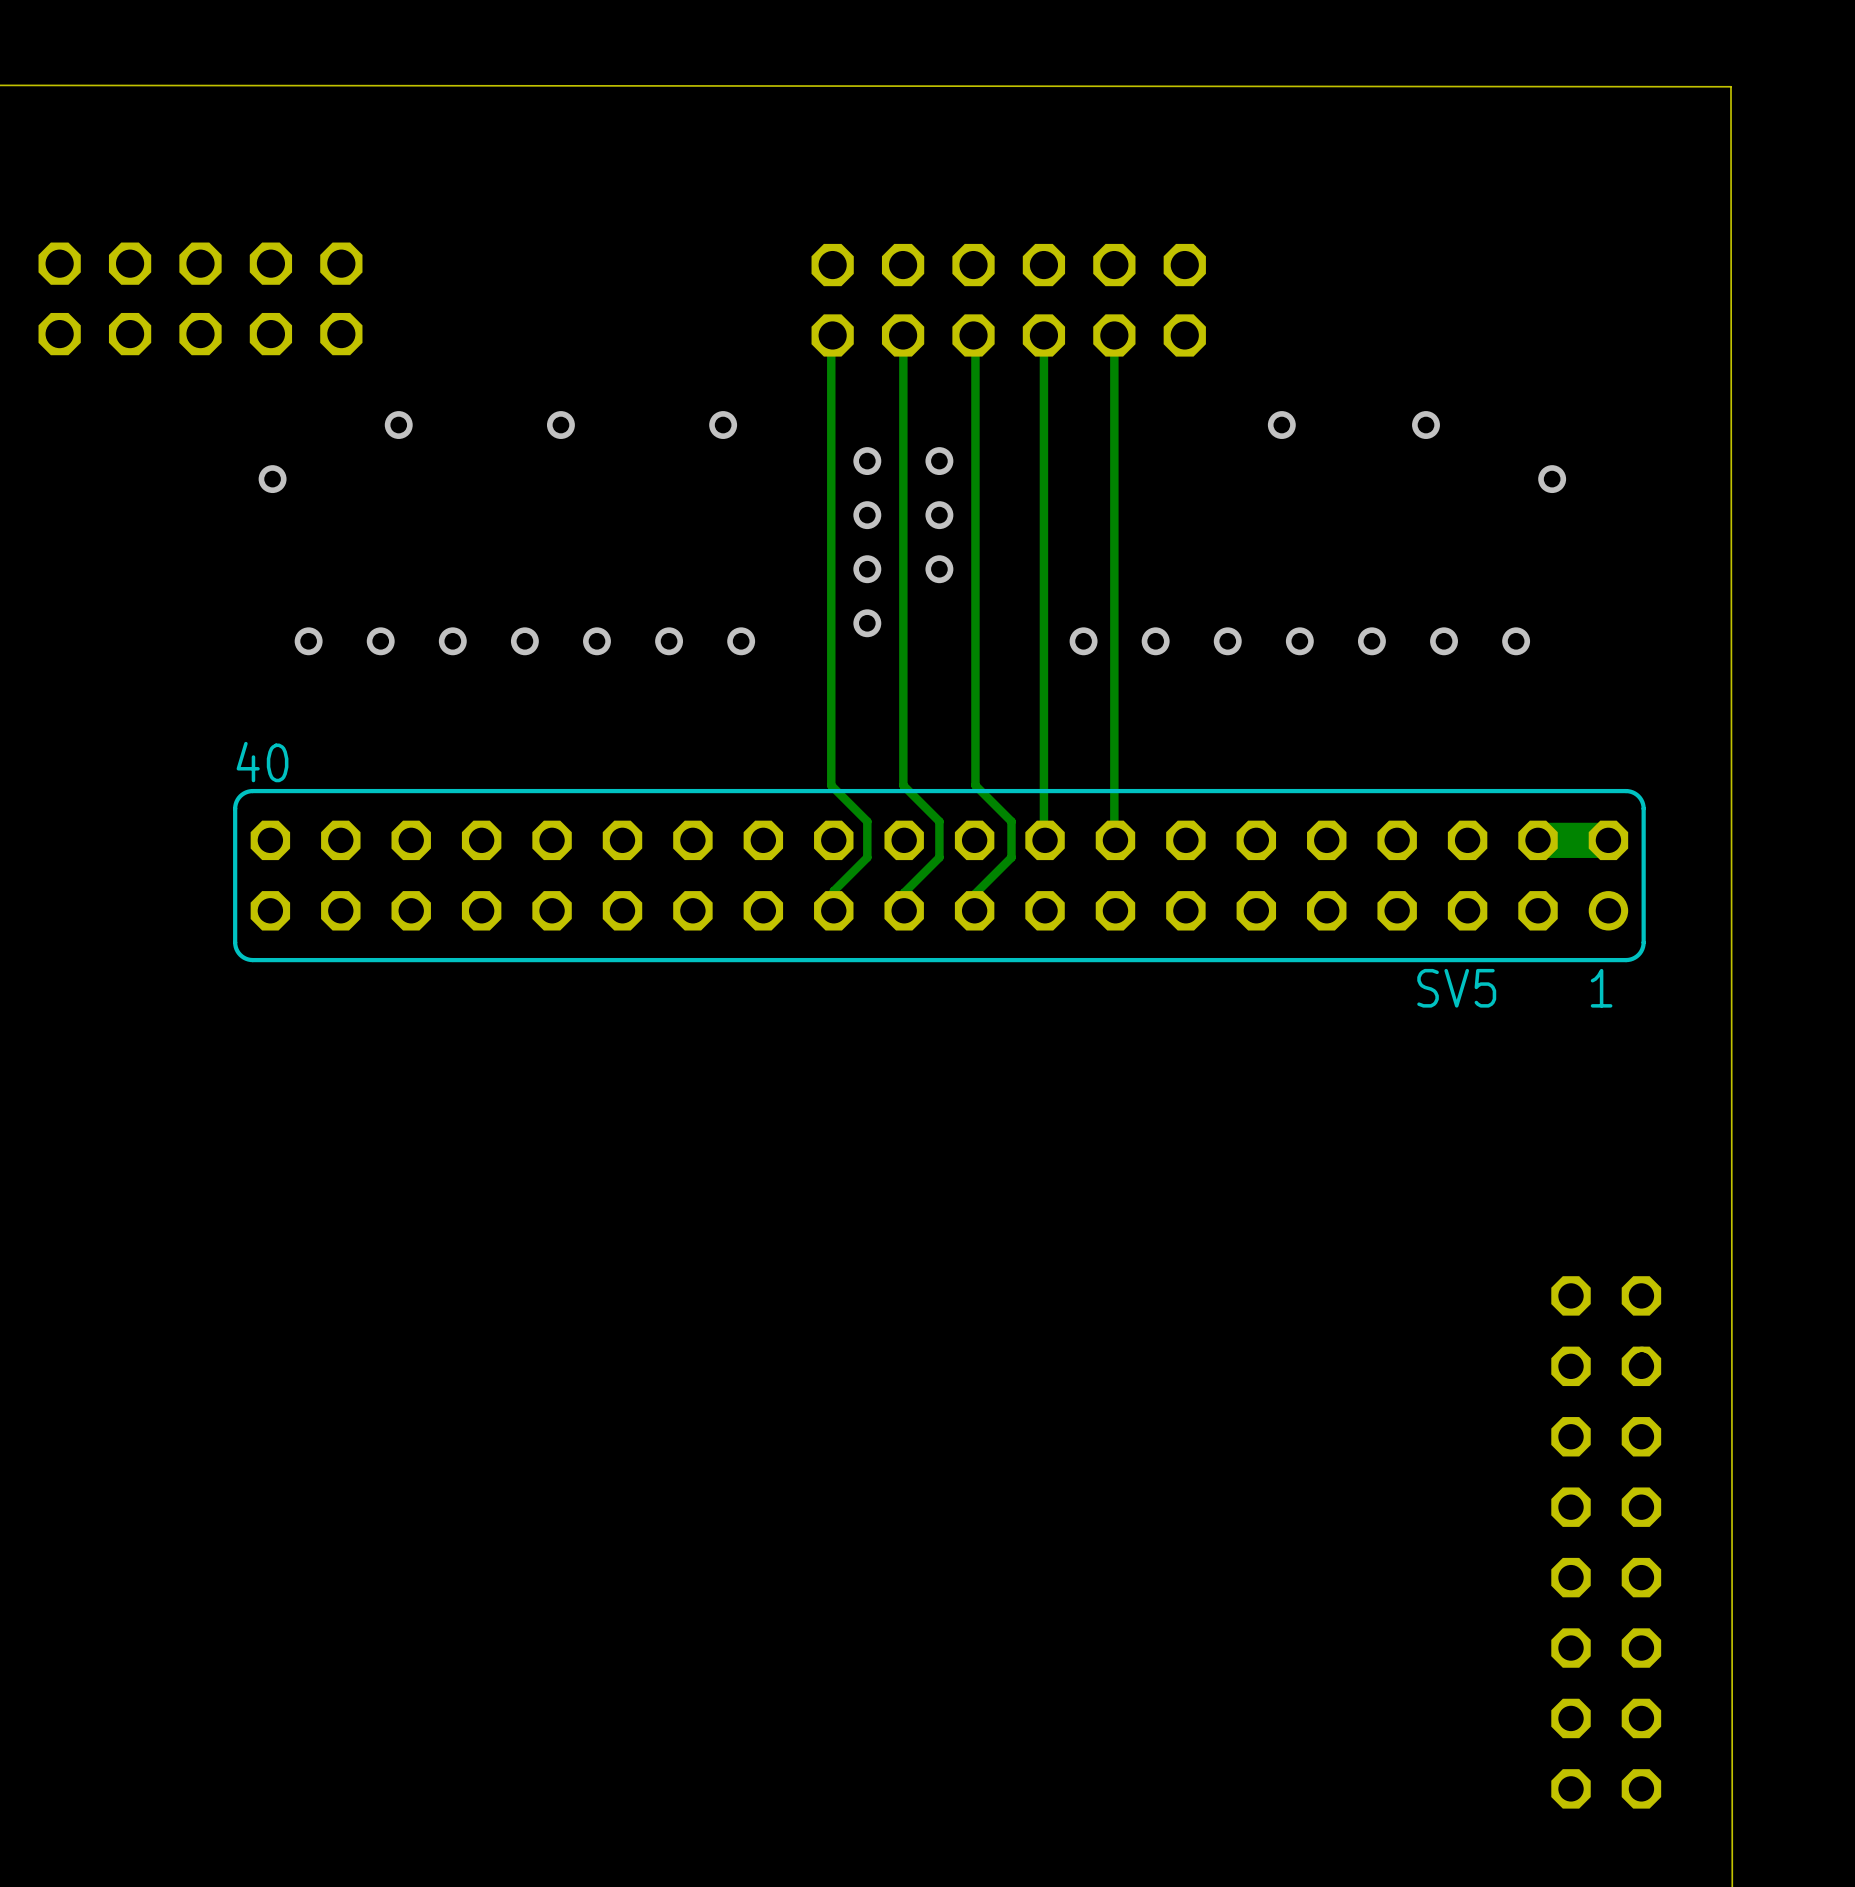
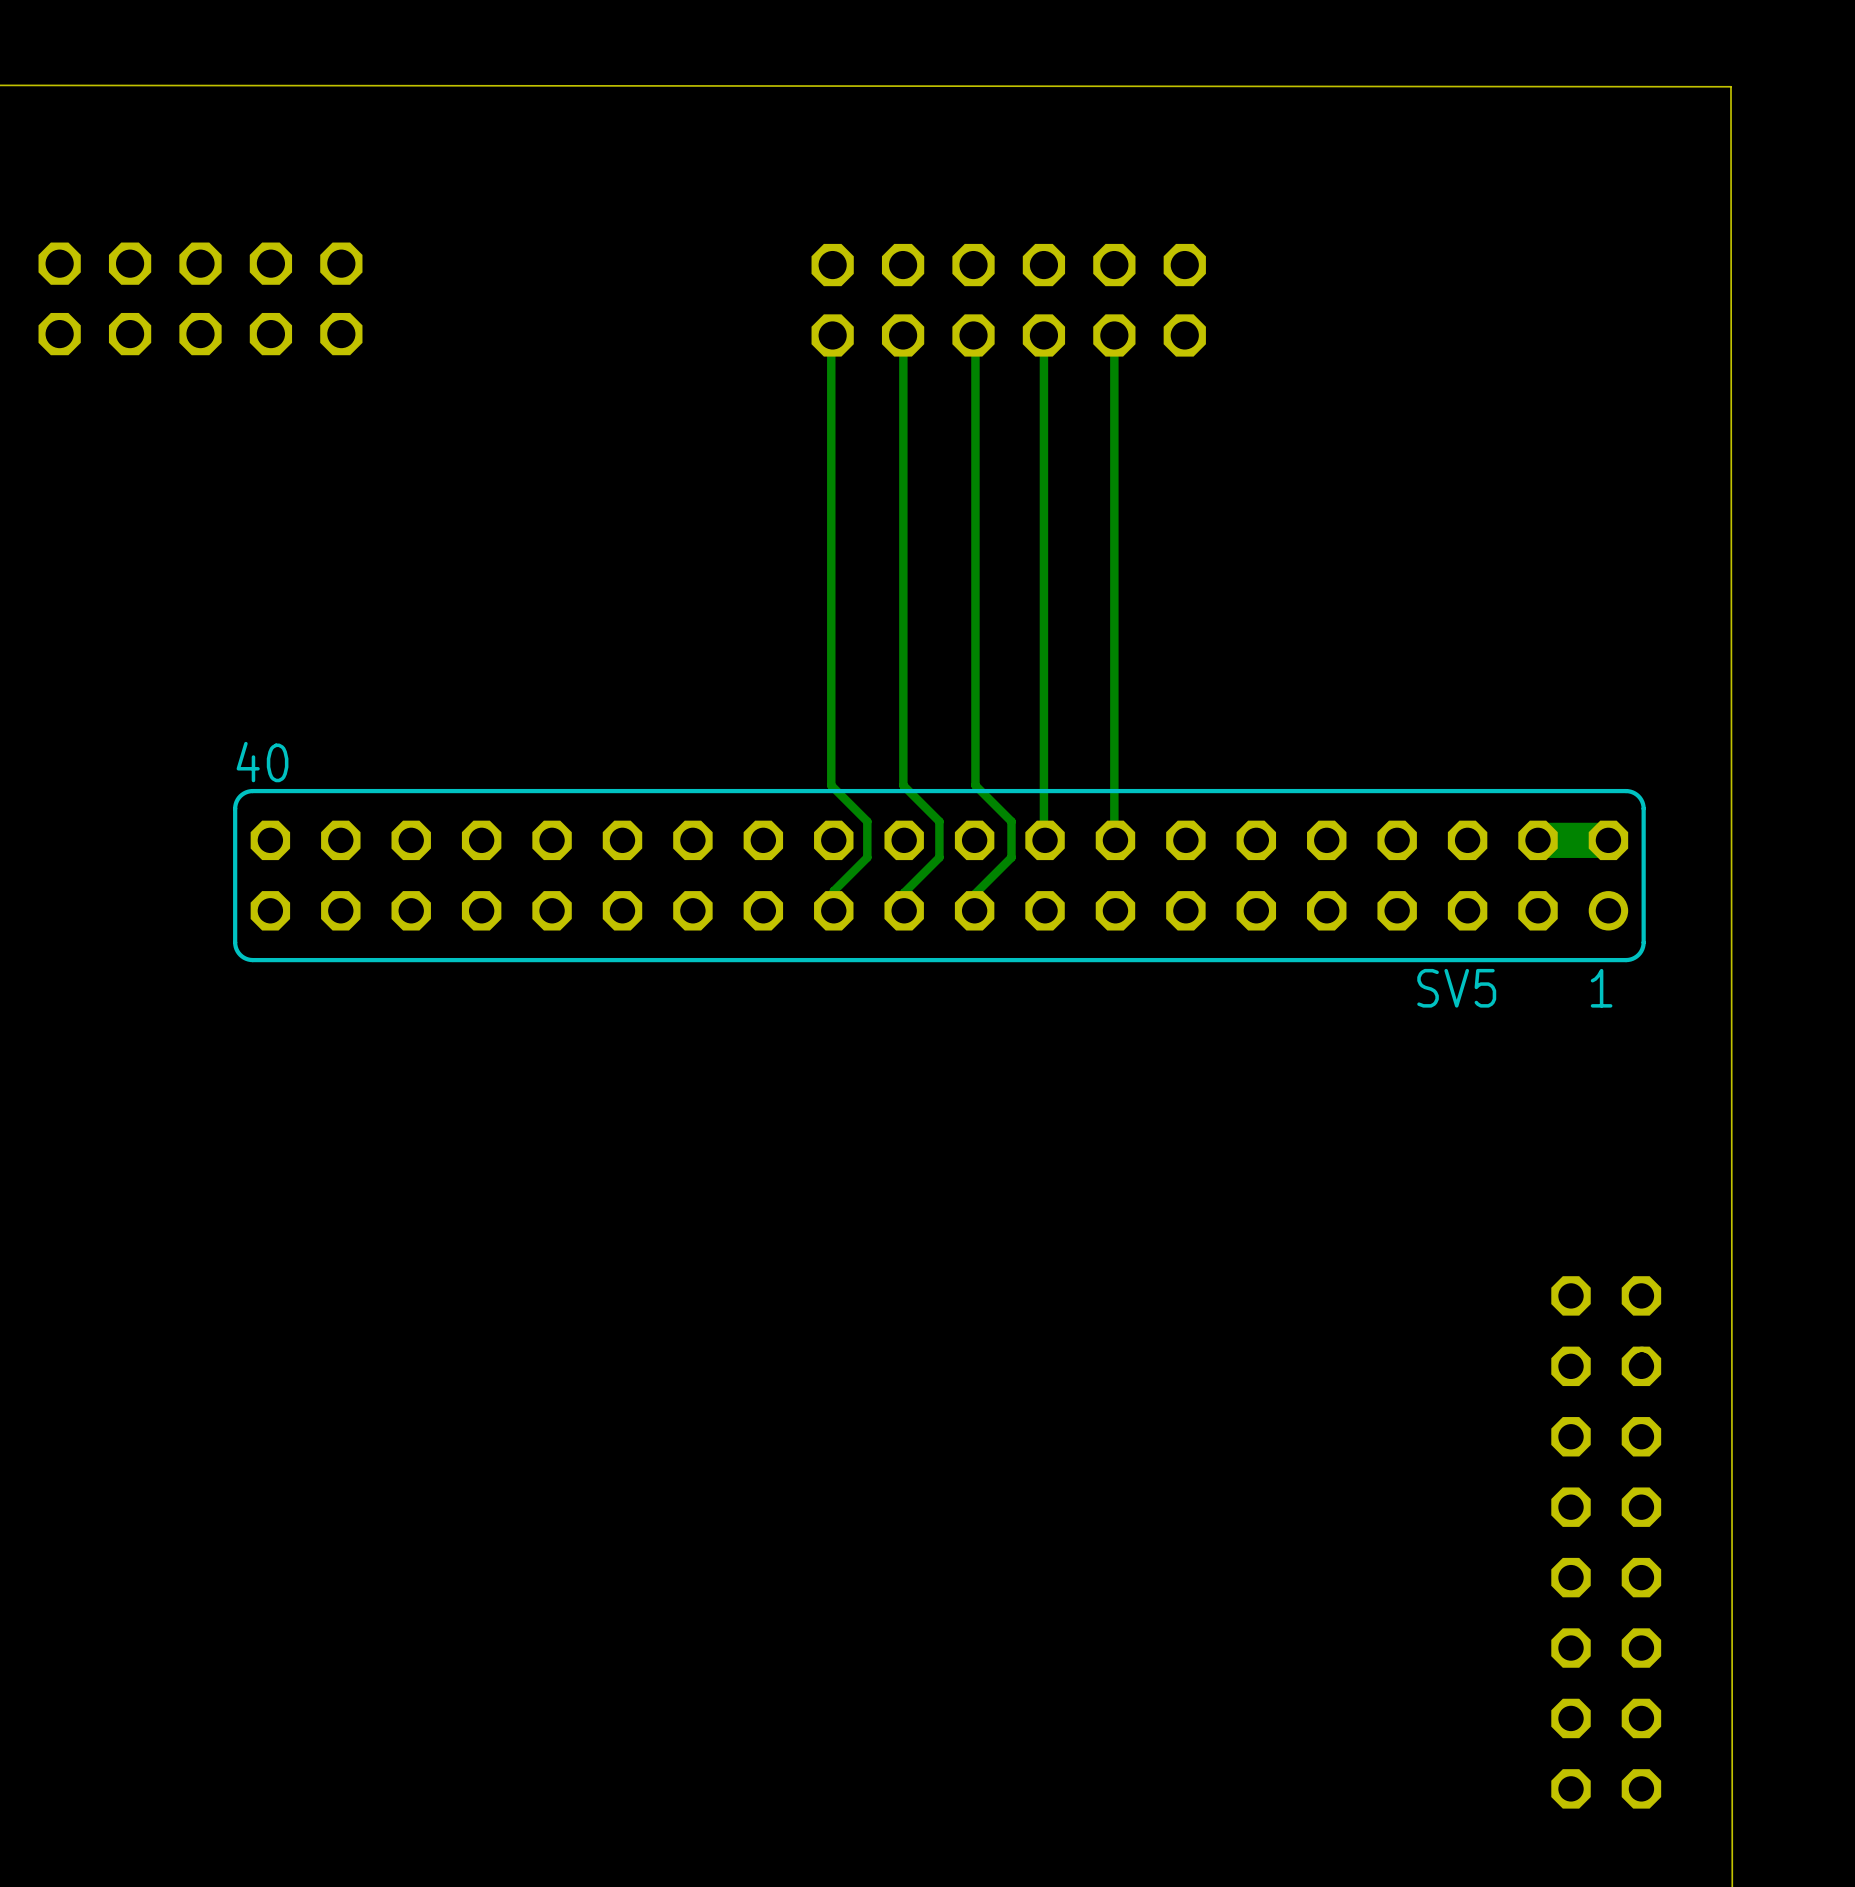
via: (398, 425) -> none
via: (560, 425) -> none
via: (723, 425) -> none
via: (1281, 425) -> none
via: (1426, 425) -> none
via: (867, 461) -> none
via: (939, 461) -> none
via: (272, 479) -> none
via: (1552, 479) -> none
via: (867, 515) -> none
via: (939, 515) -> none
via: (867, 569) -> none
via: (939, 569) -> none
via: (867, 623) -> none
via: (308, 641) -> none
via: (380, 641) -> none
via: (452, 641) -> none
via: (524, 641) -> none
via: (596, 641) -> none
via: (669, 641) -> none
via: (741, 641) -> none
via: (1083, 641) -> none
via: (1155, 641) -> none
via: (1227, 641) -> none
via: (1299, 641) -> none
via: (1371, 641) -> none
via: (1444, 641) -> none
via: (1516, 641) -> none

